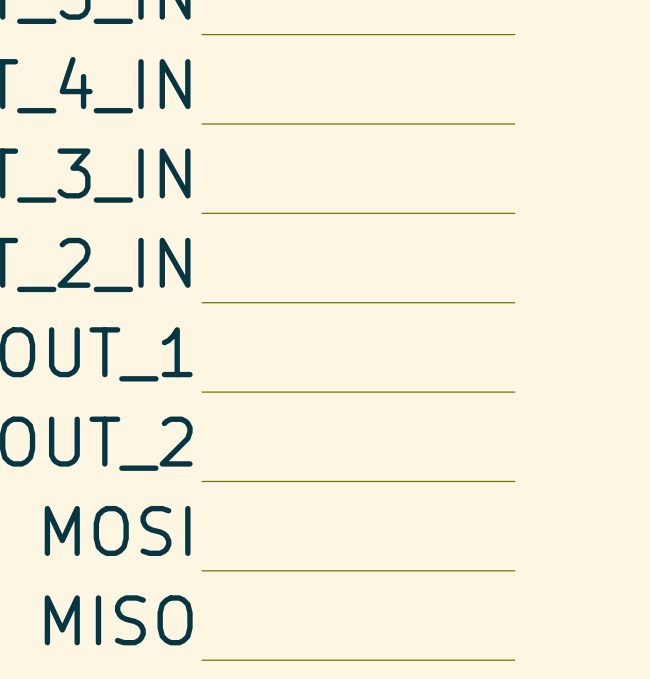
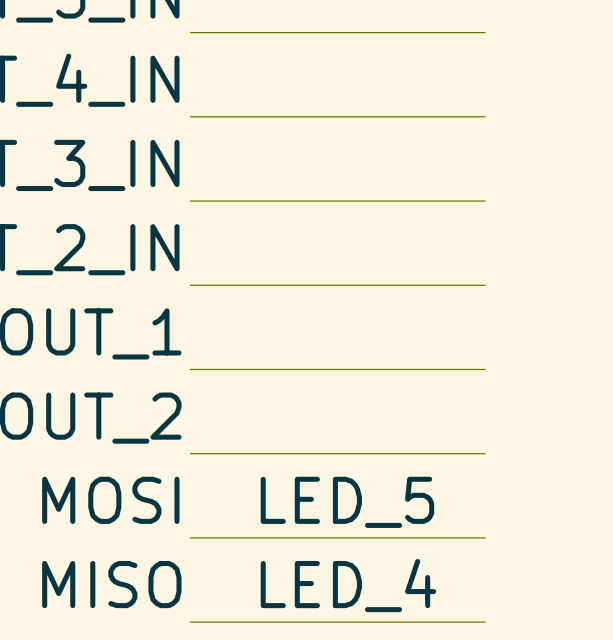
label: none -> LED_5 (347, 502)
label: none -> LED_4 (348, 585)

